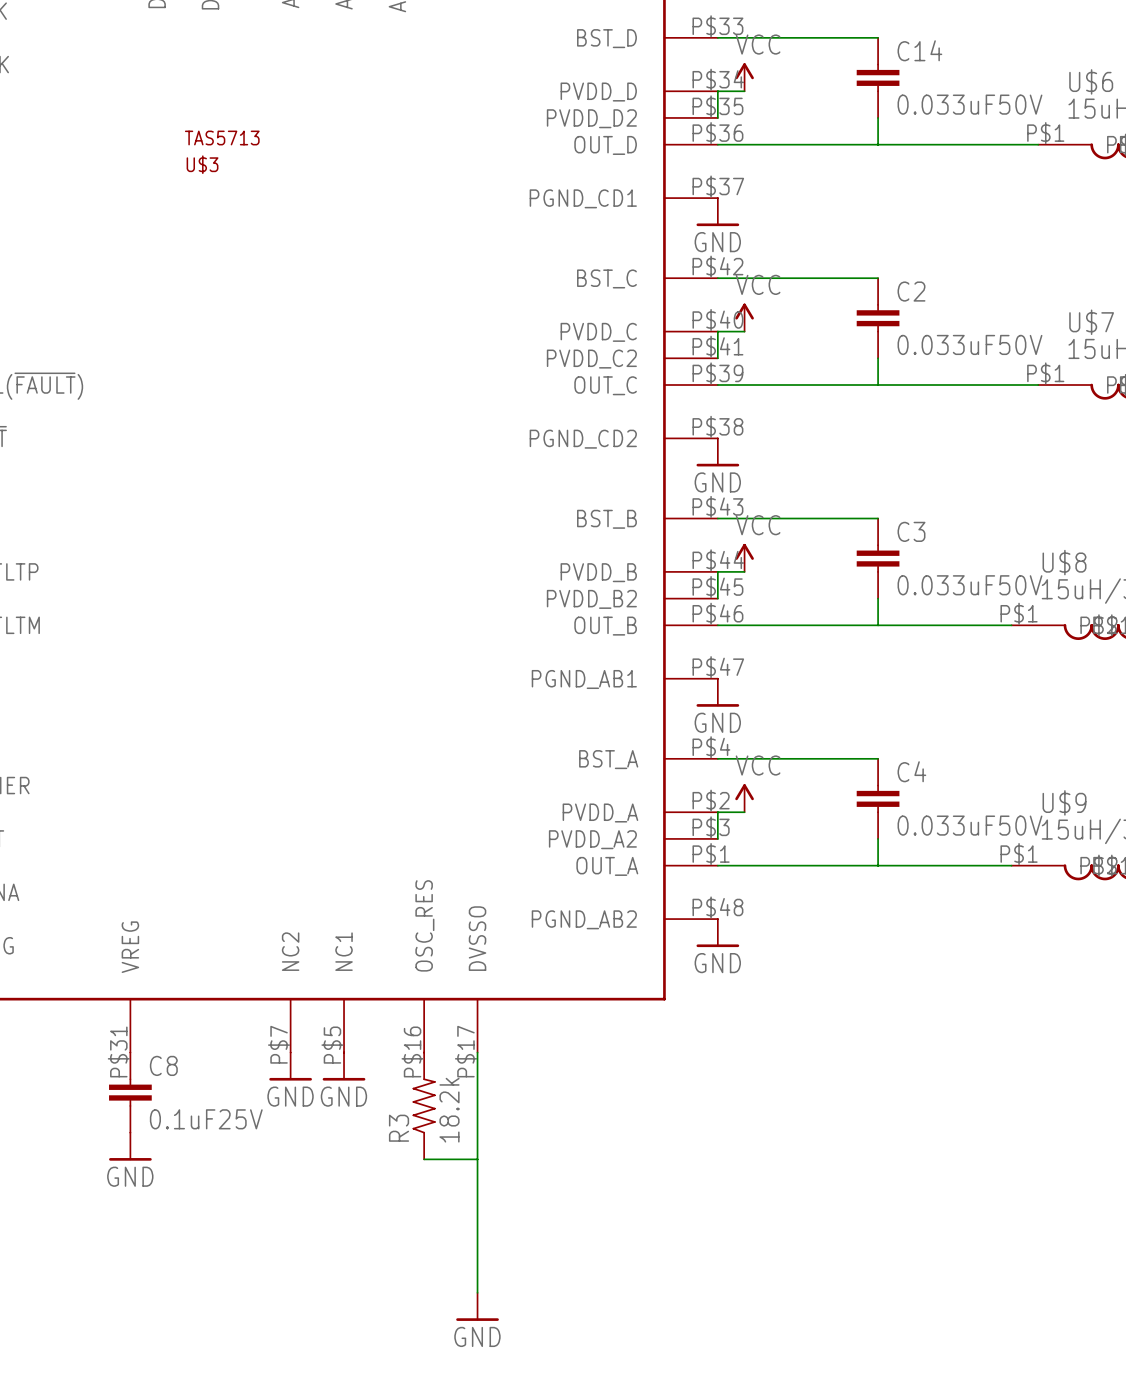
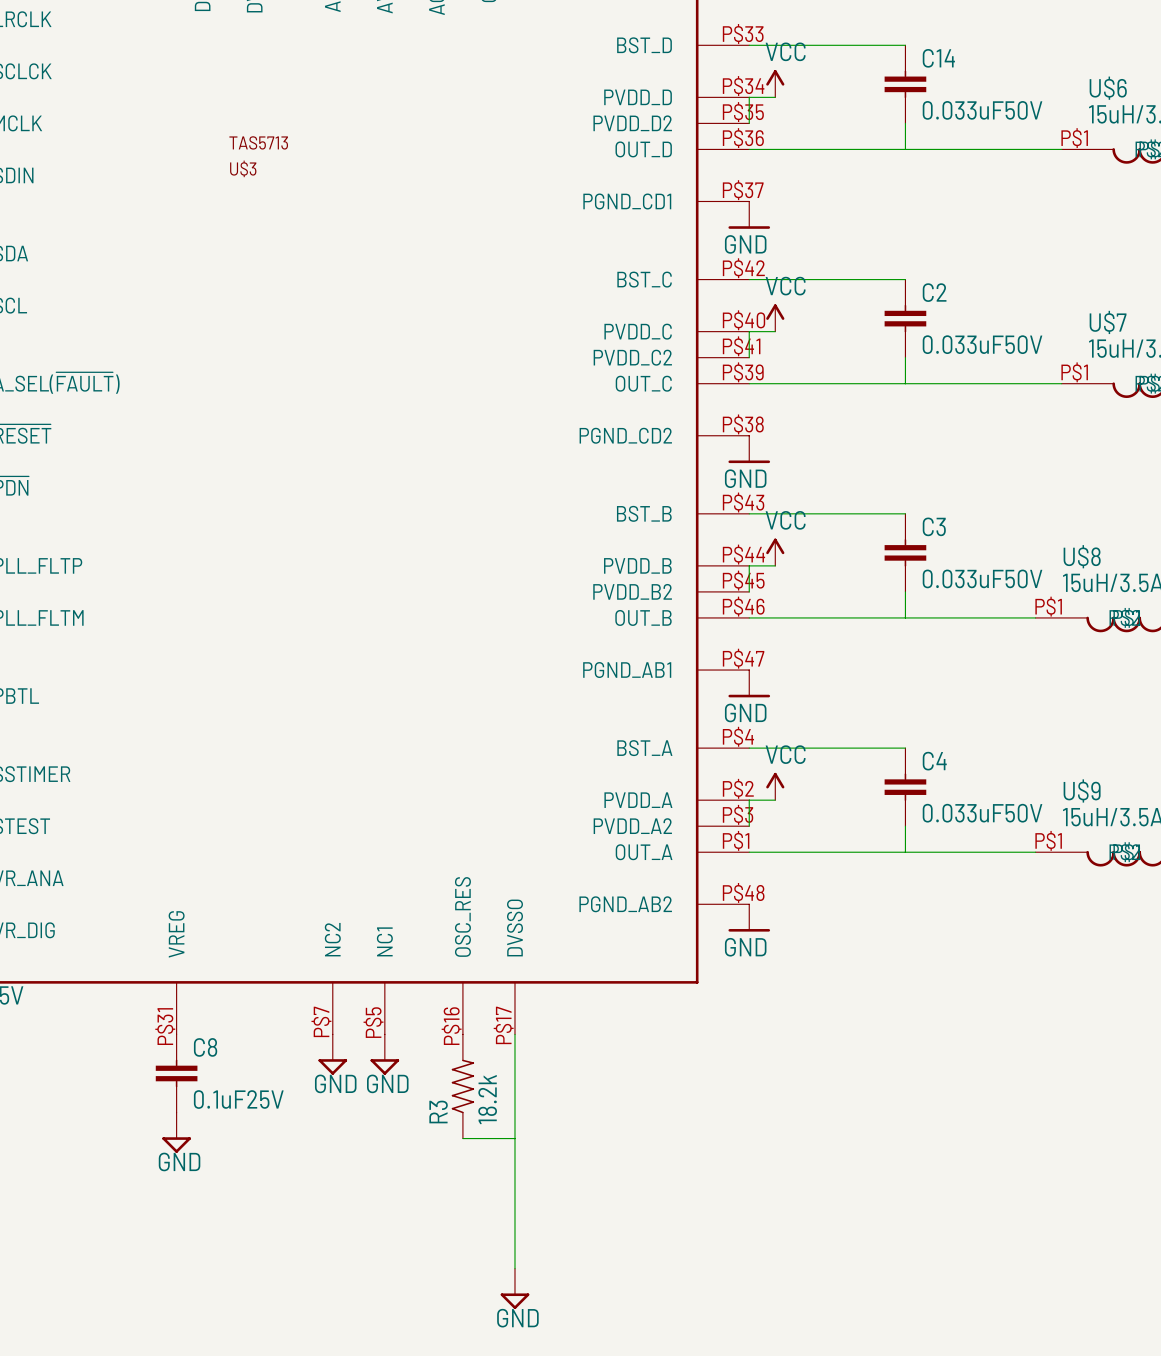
power symbol shape: [269, 1052, 312, 1081] -> [318, 1034, 348, 1075]
power symbol shape: [322, 1052, 366, 1081] -> [370, 1034, 400, 1075]
power symbol shape: [109, 1132, 152, 1161] -> [162, 1112, 191, 1153]
power symbol shape: [456, 1292, 499, 1321] -> [500, 1268, 530, 1310]

